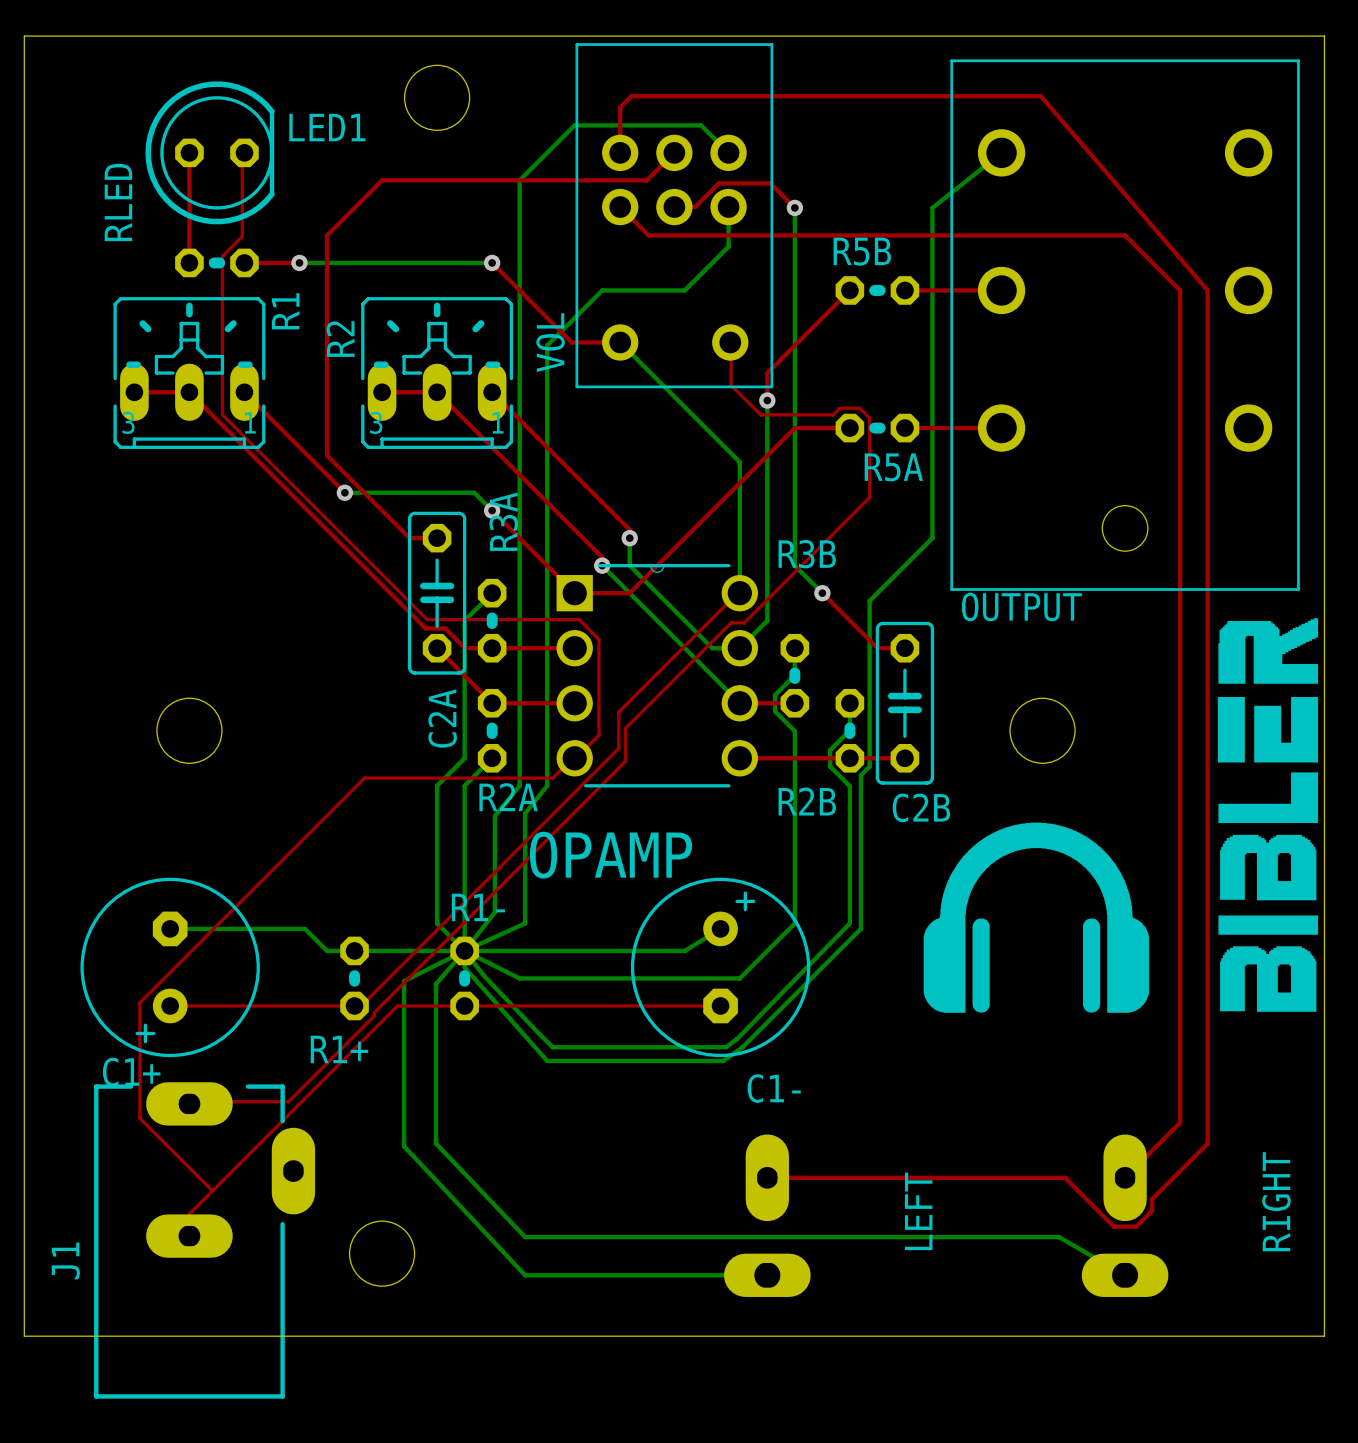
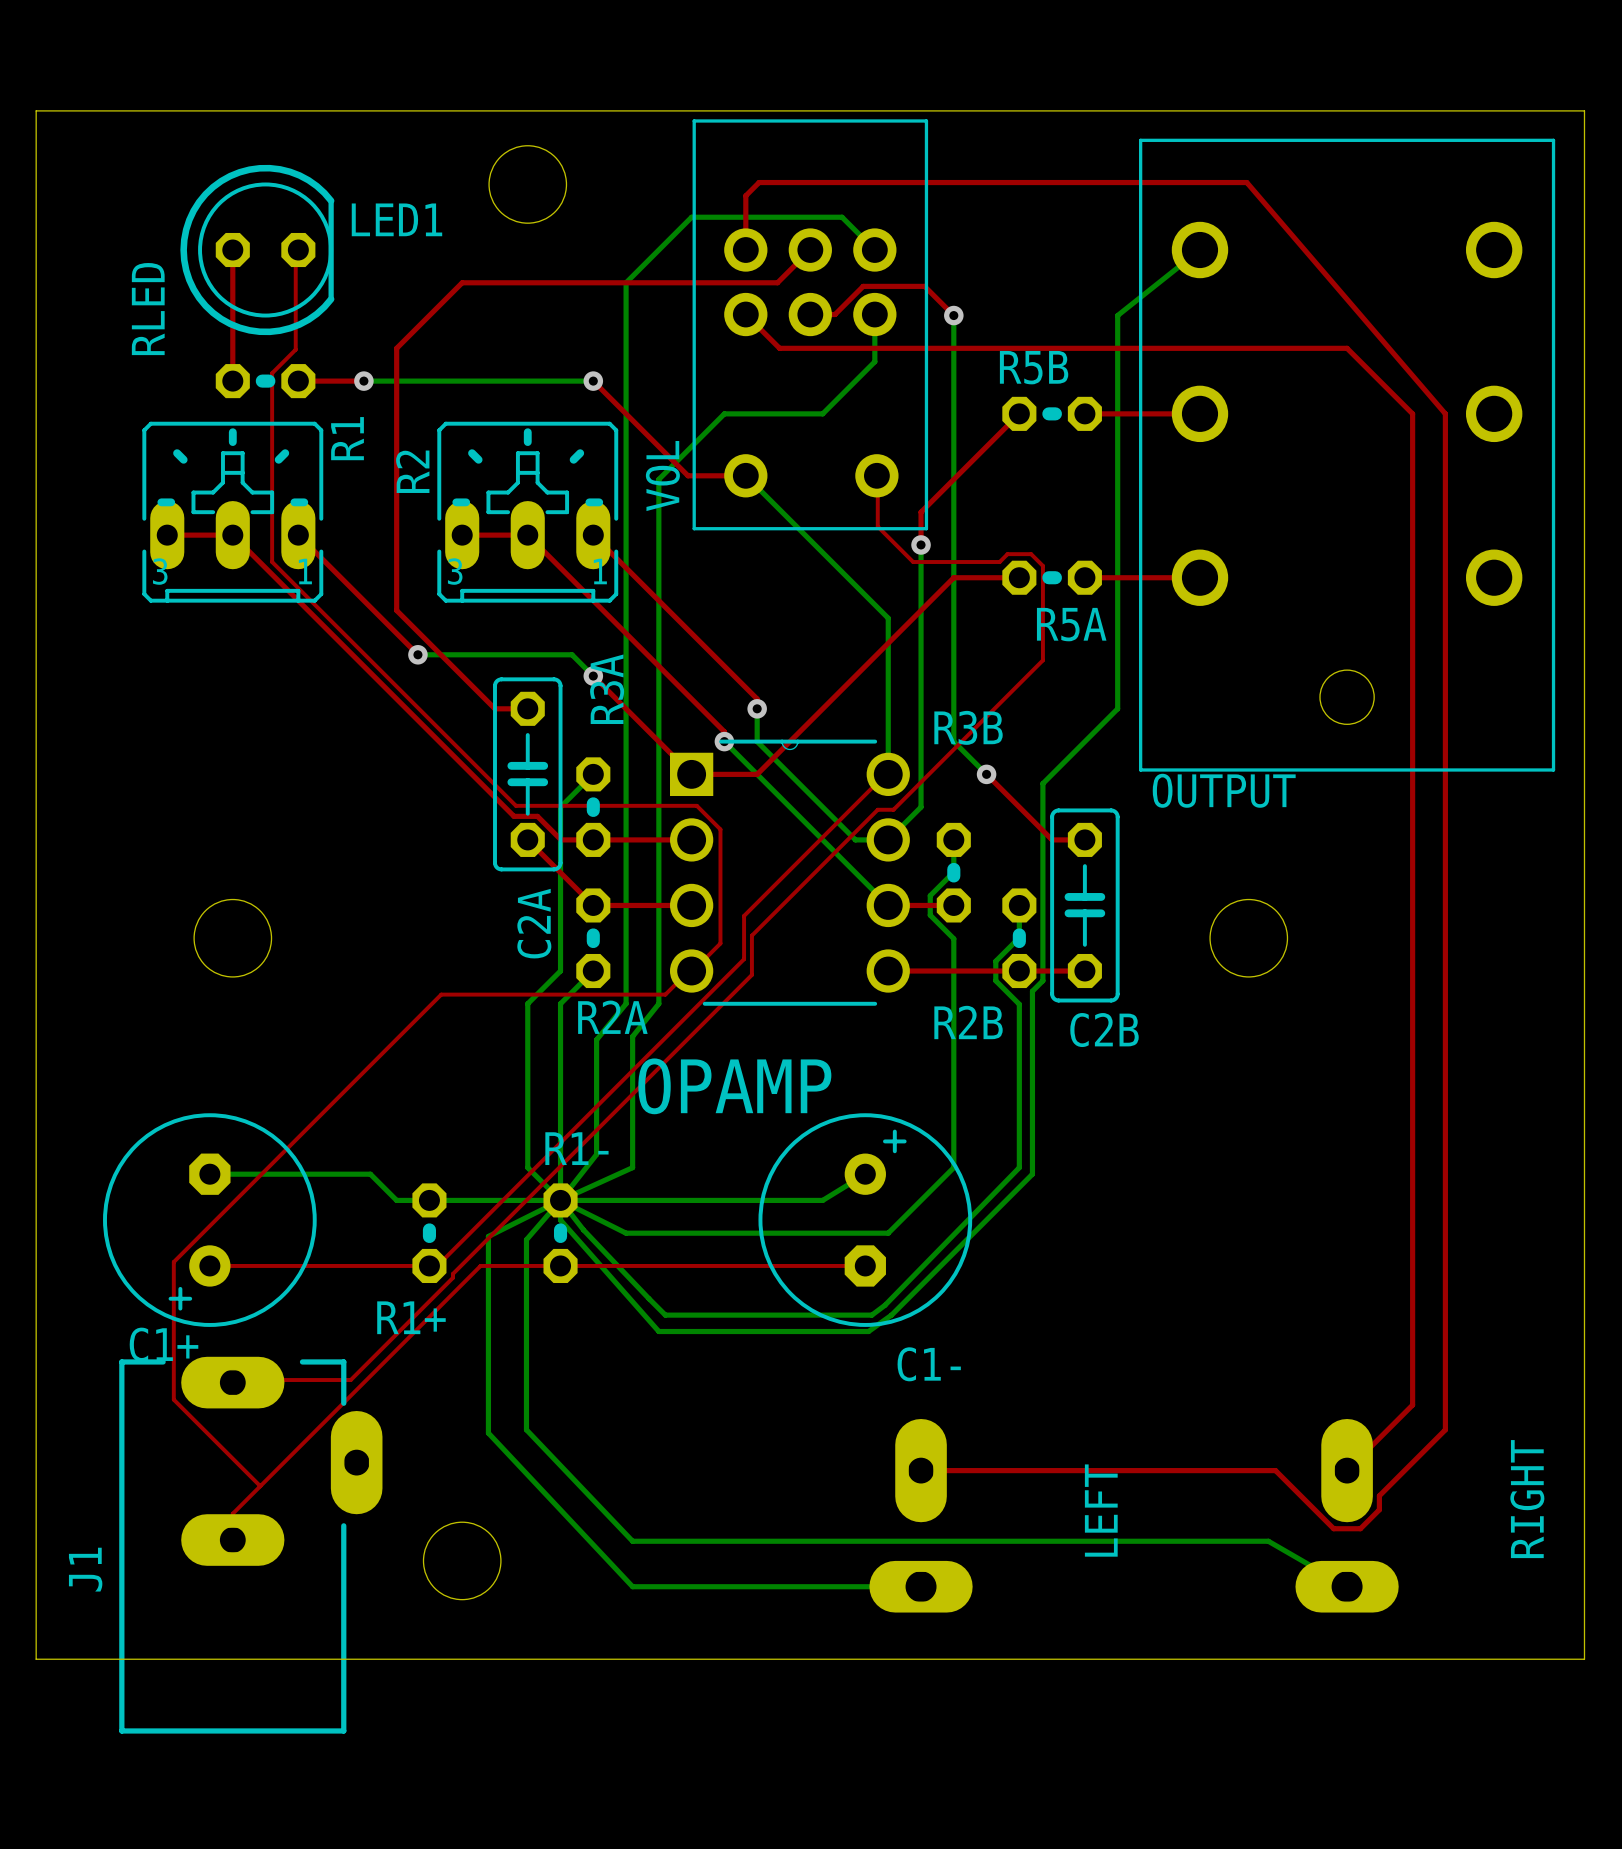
drawing: [1217, 618, 1319, 1012] -> none
drawing: [923, 822, 1150, 1013] -> none

